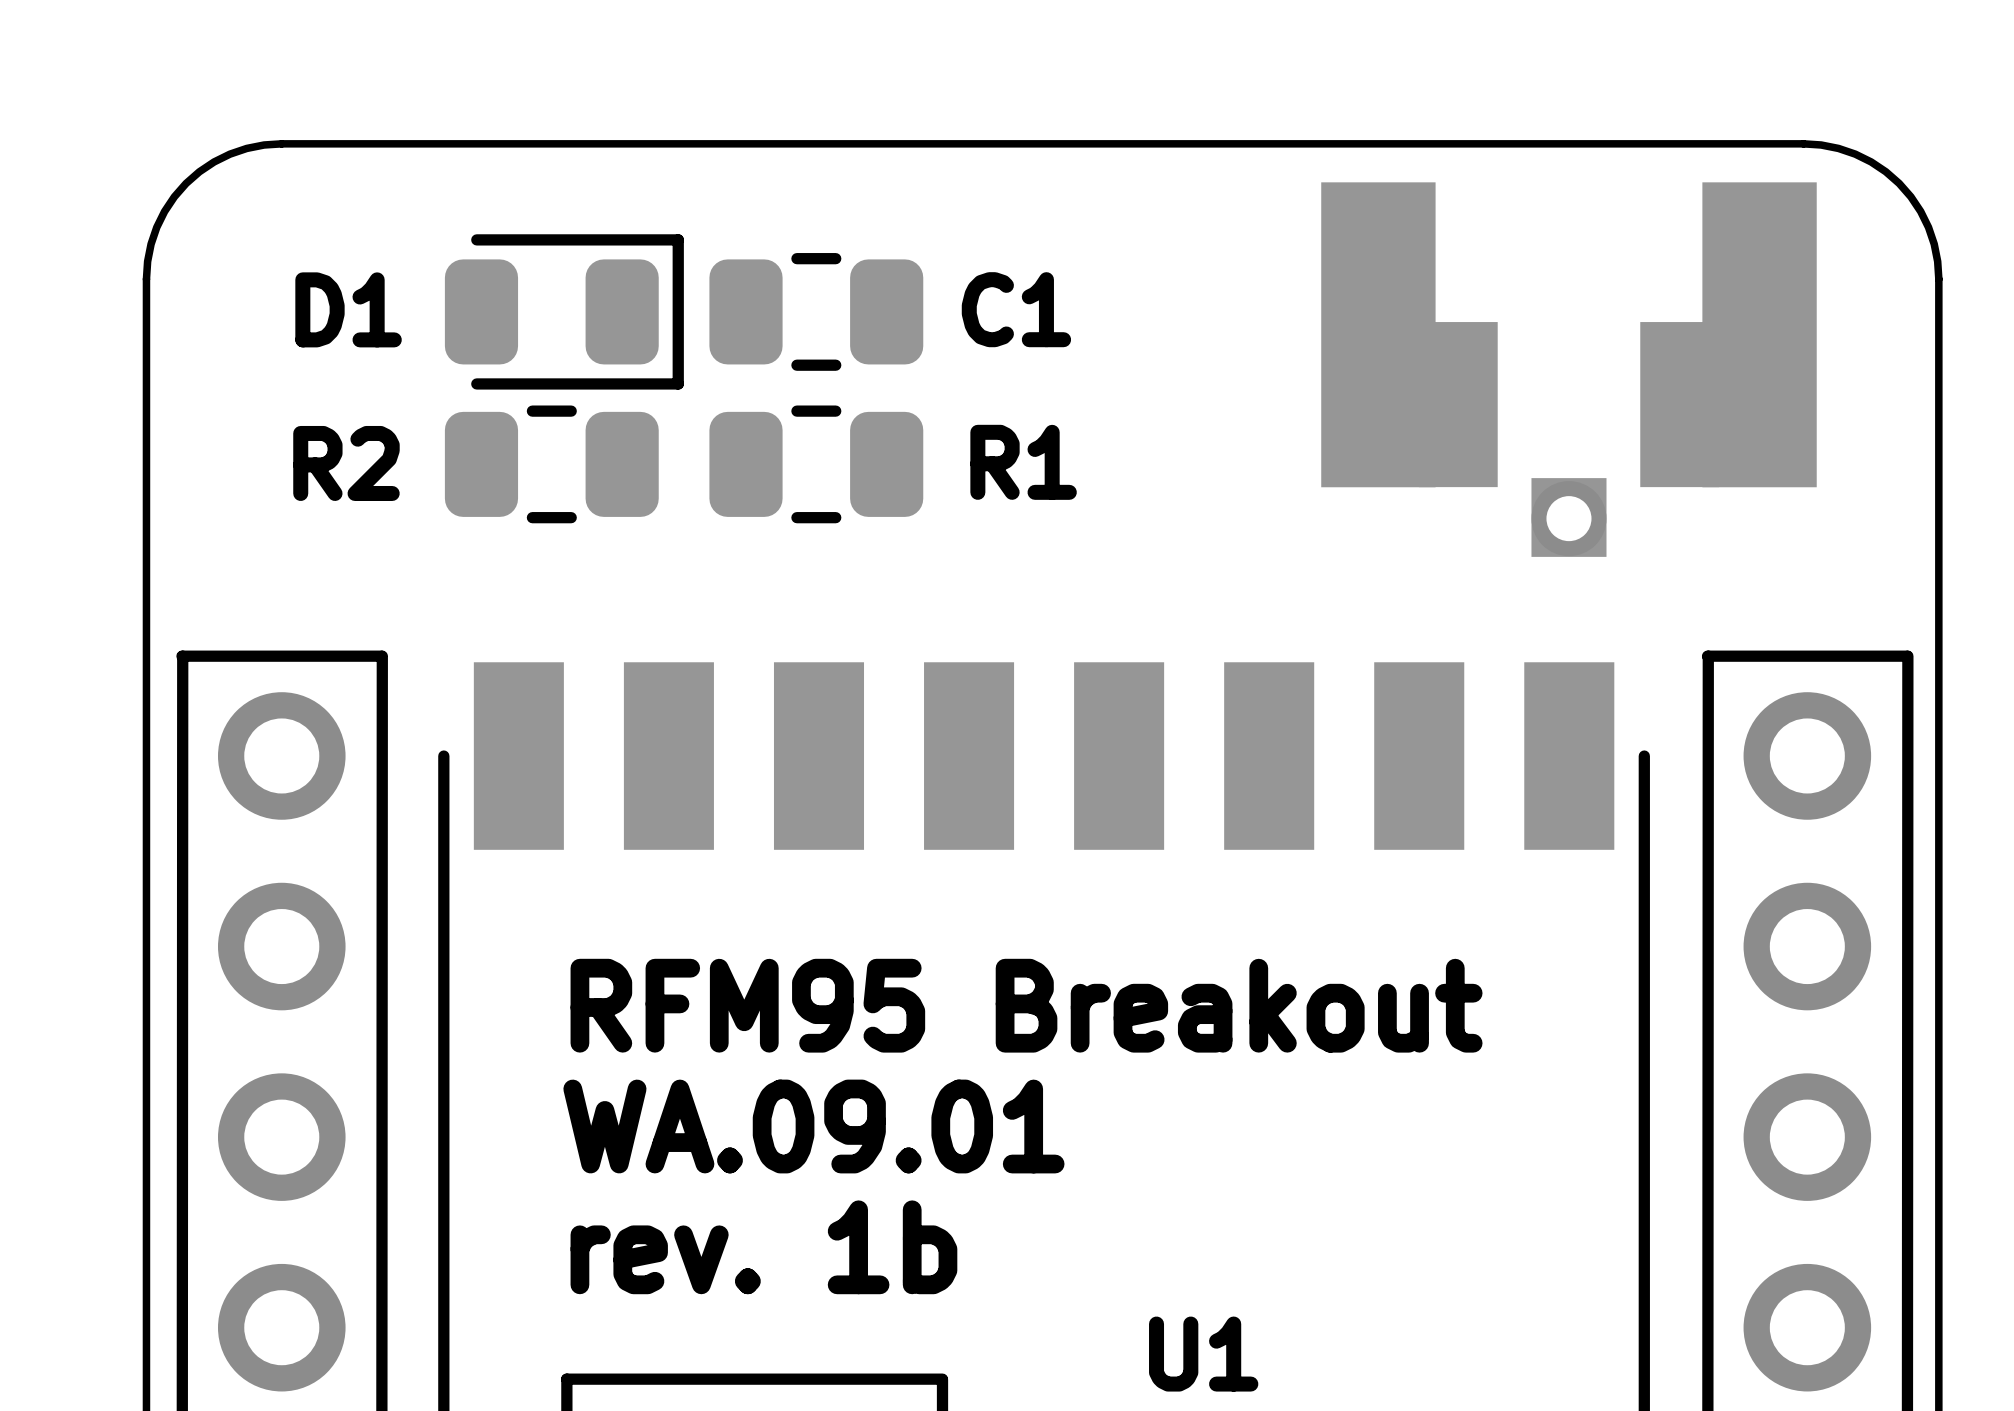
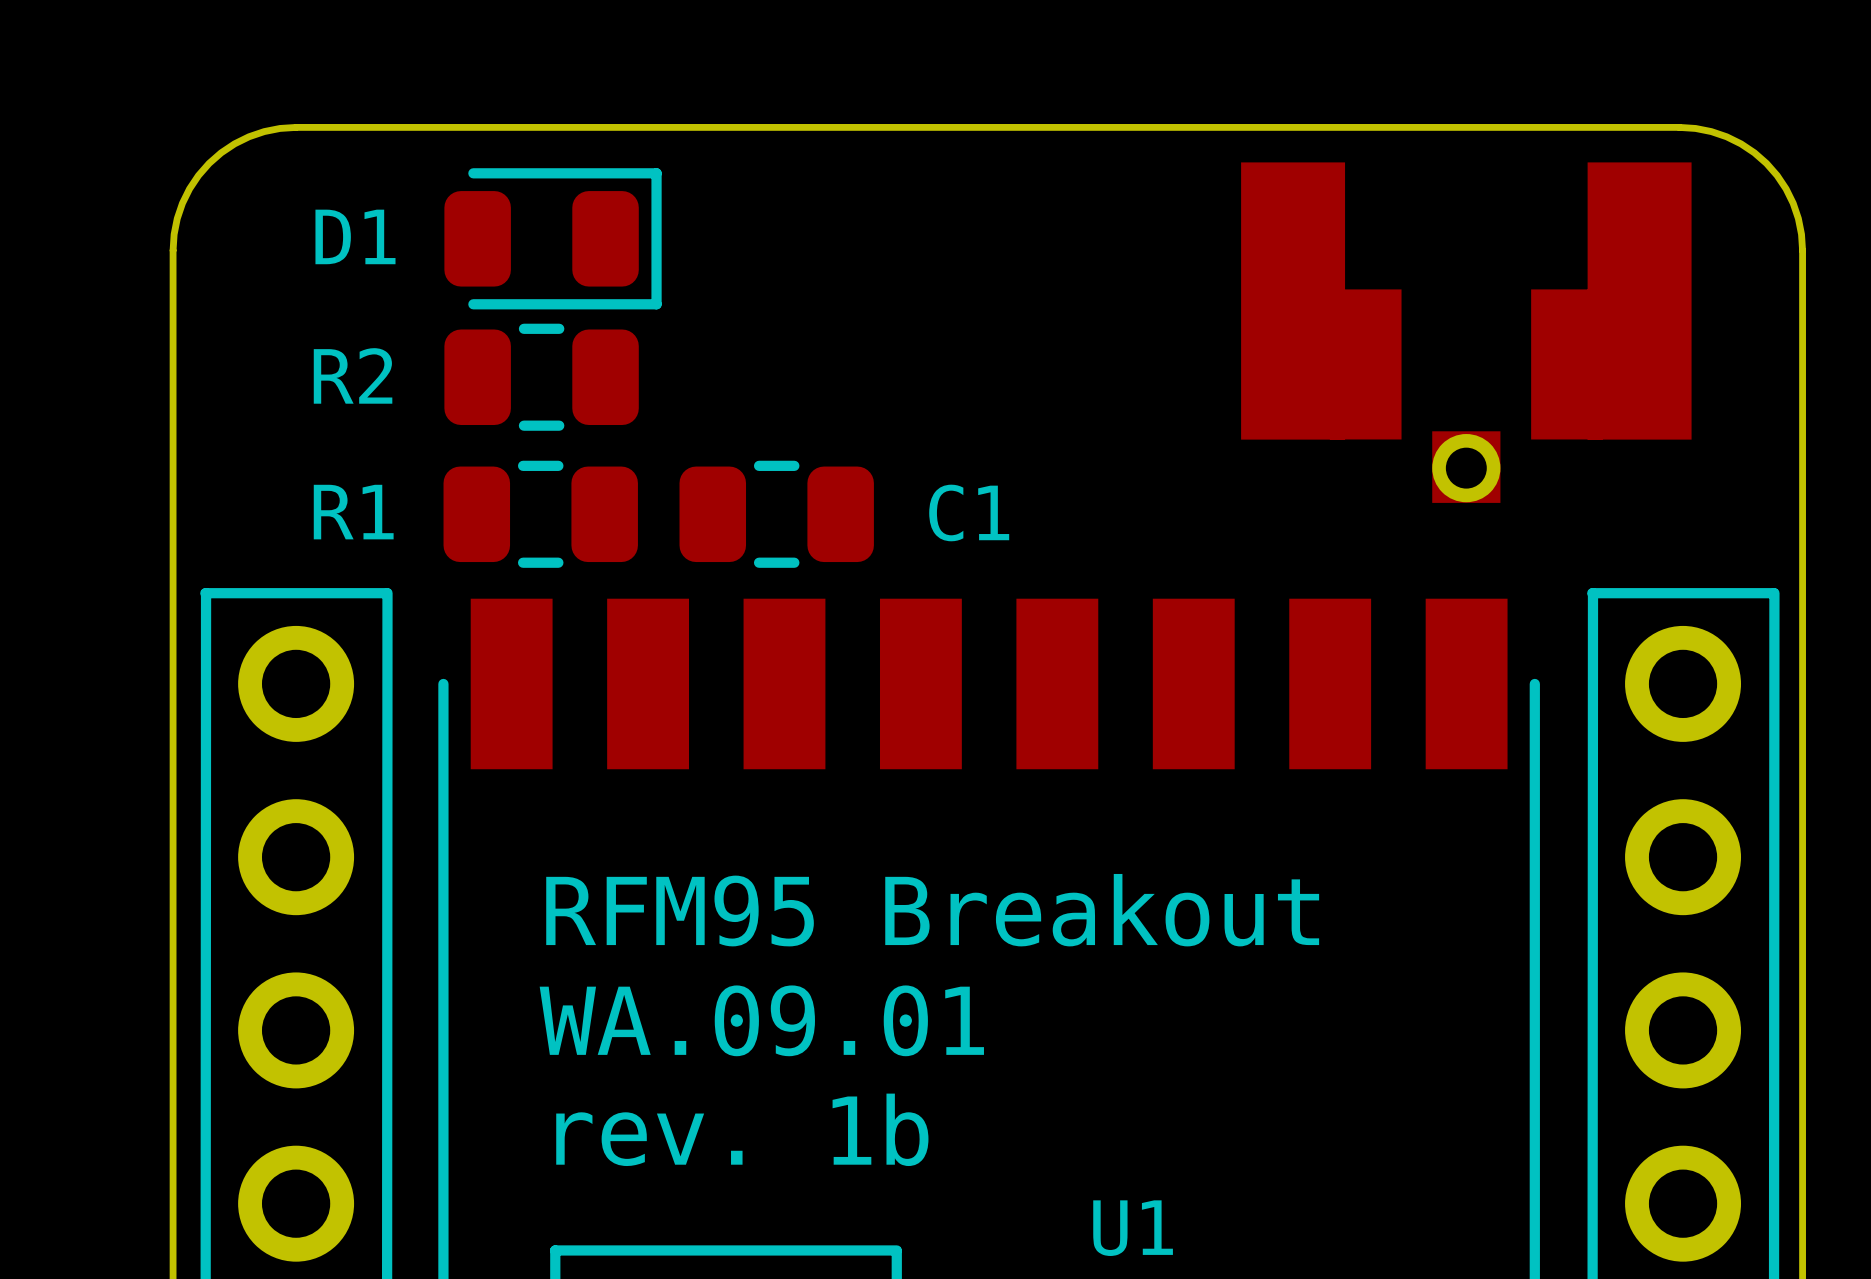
C1 name position: C1 (1016, 309) -> C1 (969, 512)
D1 position: (564, 311) -> (553, 238)
C1 position: (816, 311) -> (776, 514)
R1 name position: R1 (1023, 462) -> R1 (353, 512)
R2 position: (551, 464) -> (541, 377)
R1 position: (816, 464) -> (540, 514)

